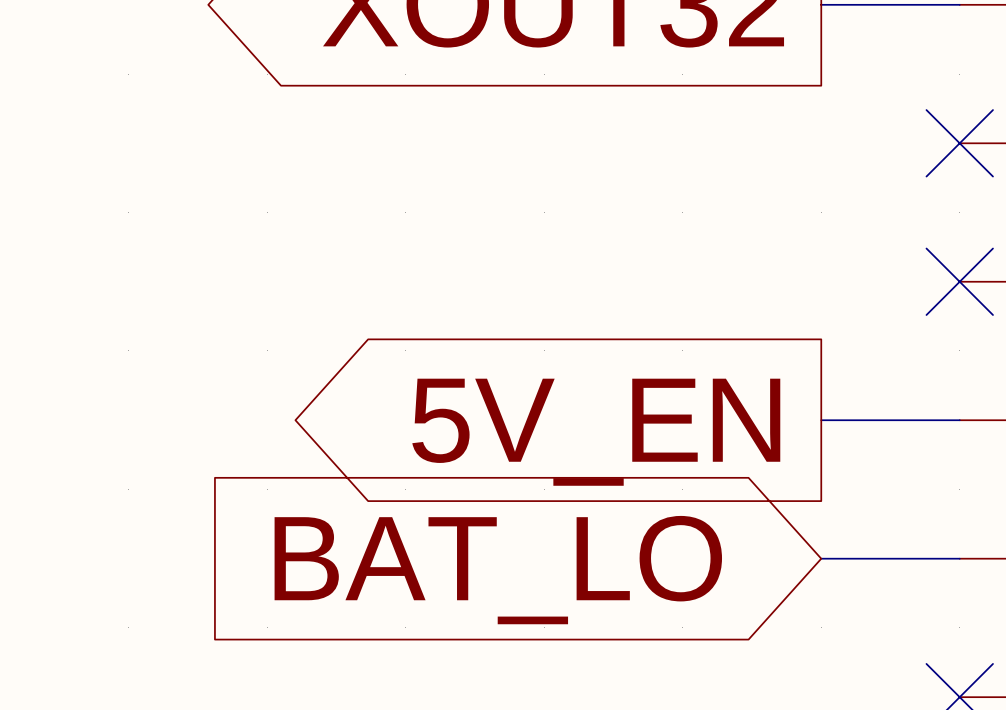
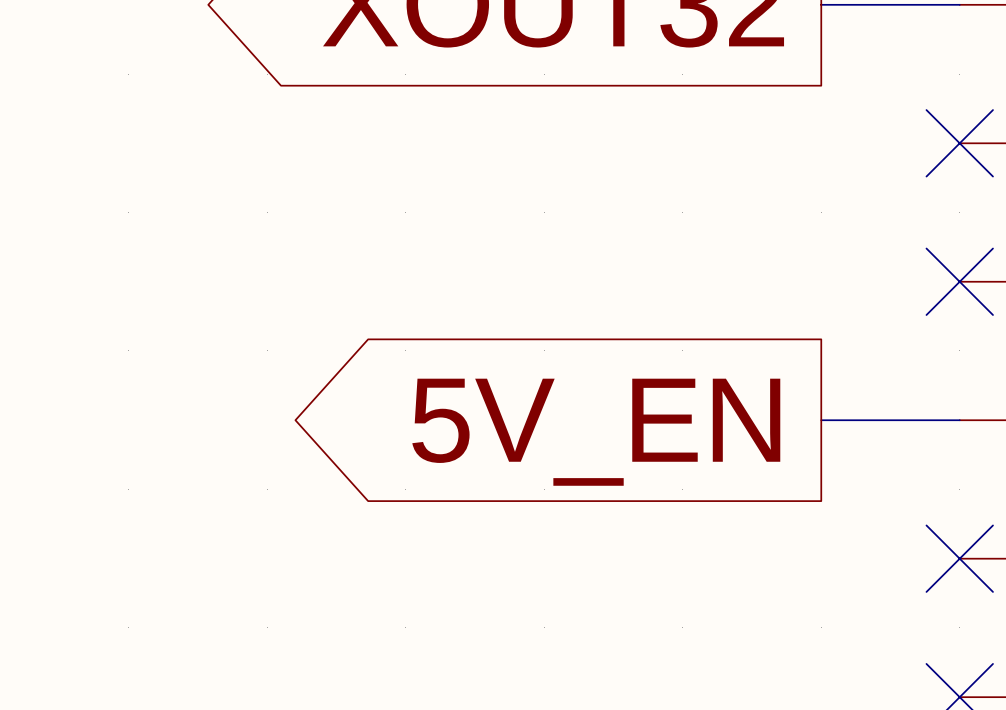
wire: (821, 558) (959, 558) -> none
no-connect mark: none -> (959, 558)
global label: BAT_LO (498, 570) -> none

